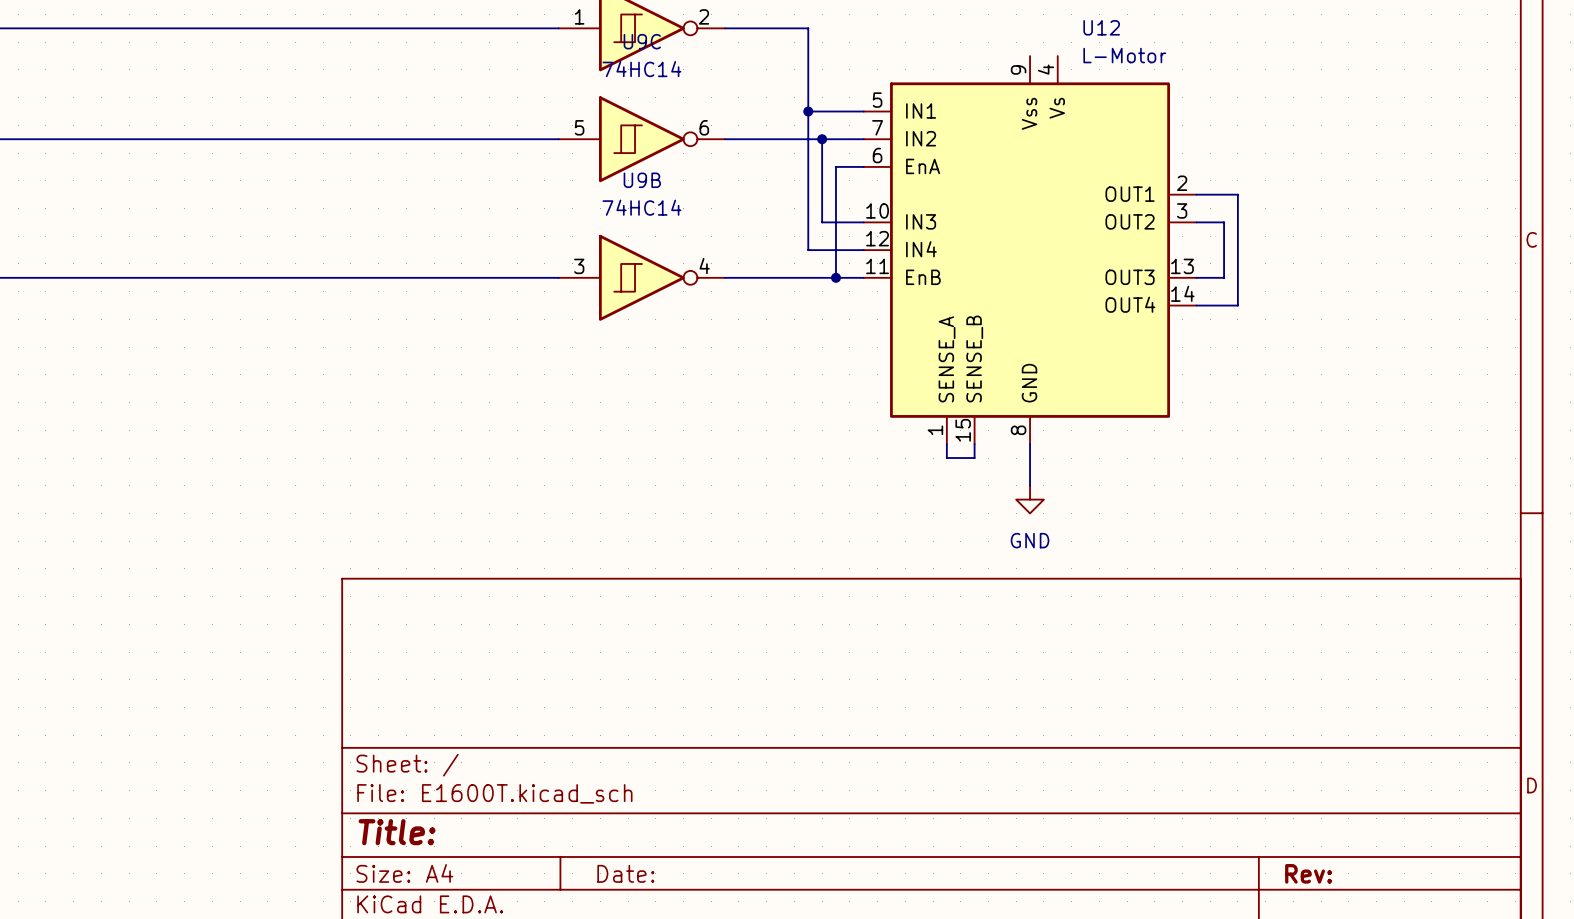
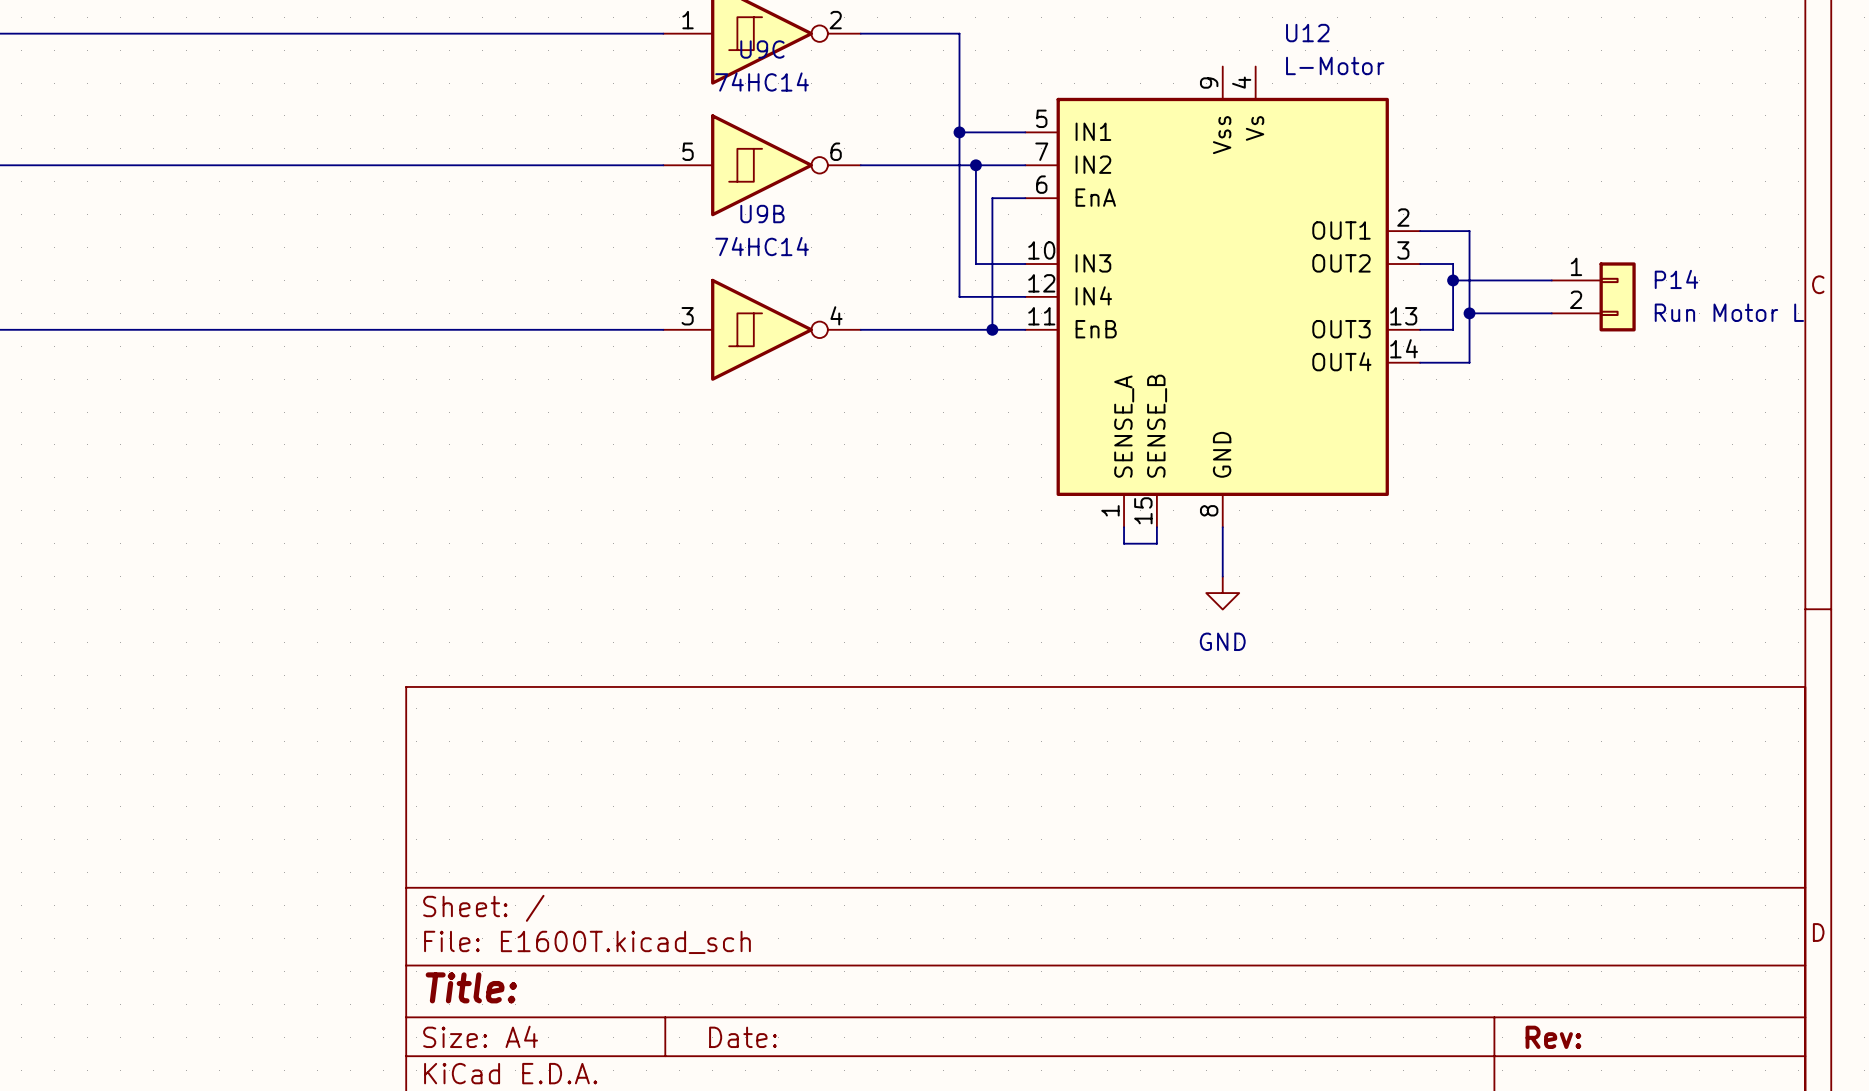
wire: none -> (1453, 280) (1551, 280)
junction: none -> (1453, 280)
P14: none -> Run Motor L (1593, 296)
wire: none -> (1469, 313) (1551, 313)
junction: none -> (1469, 313)

